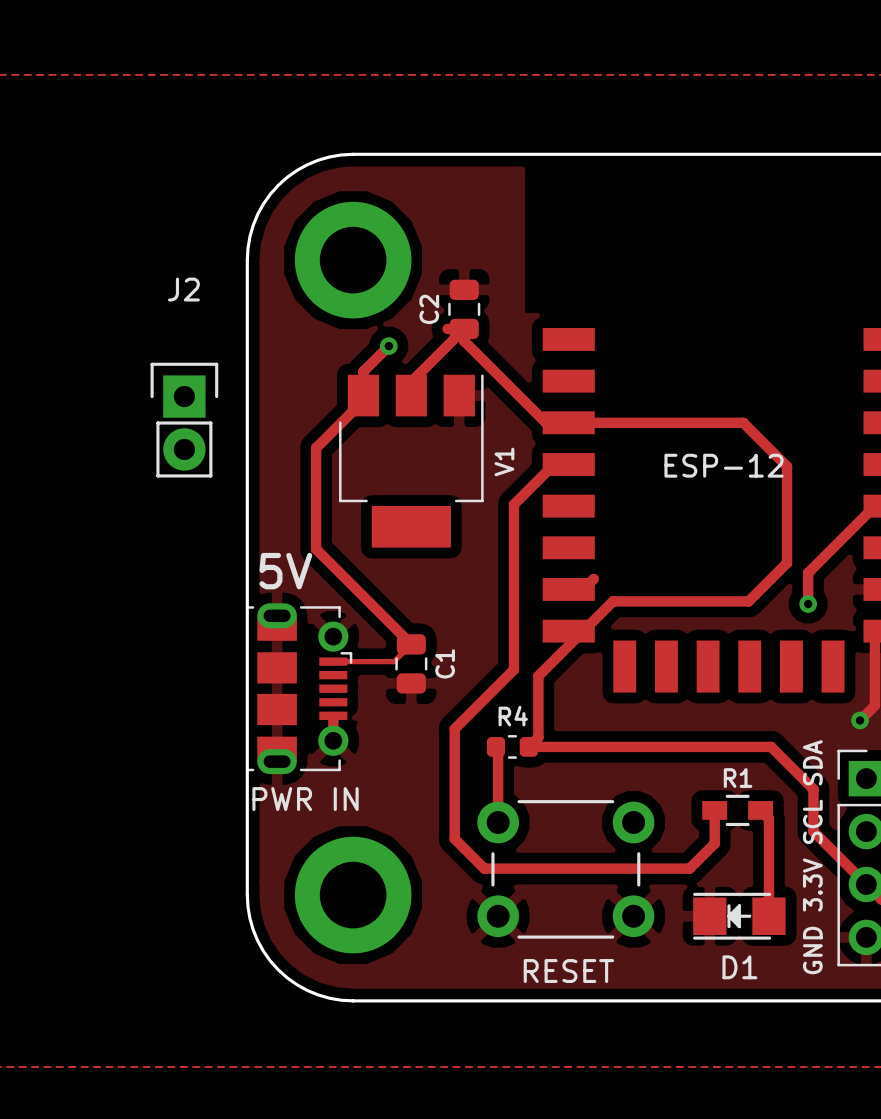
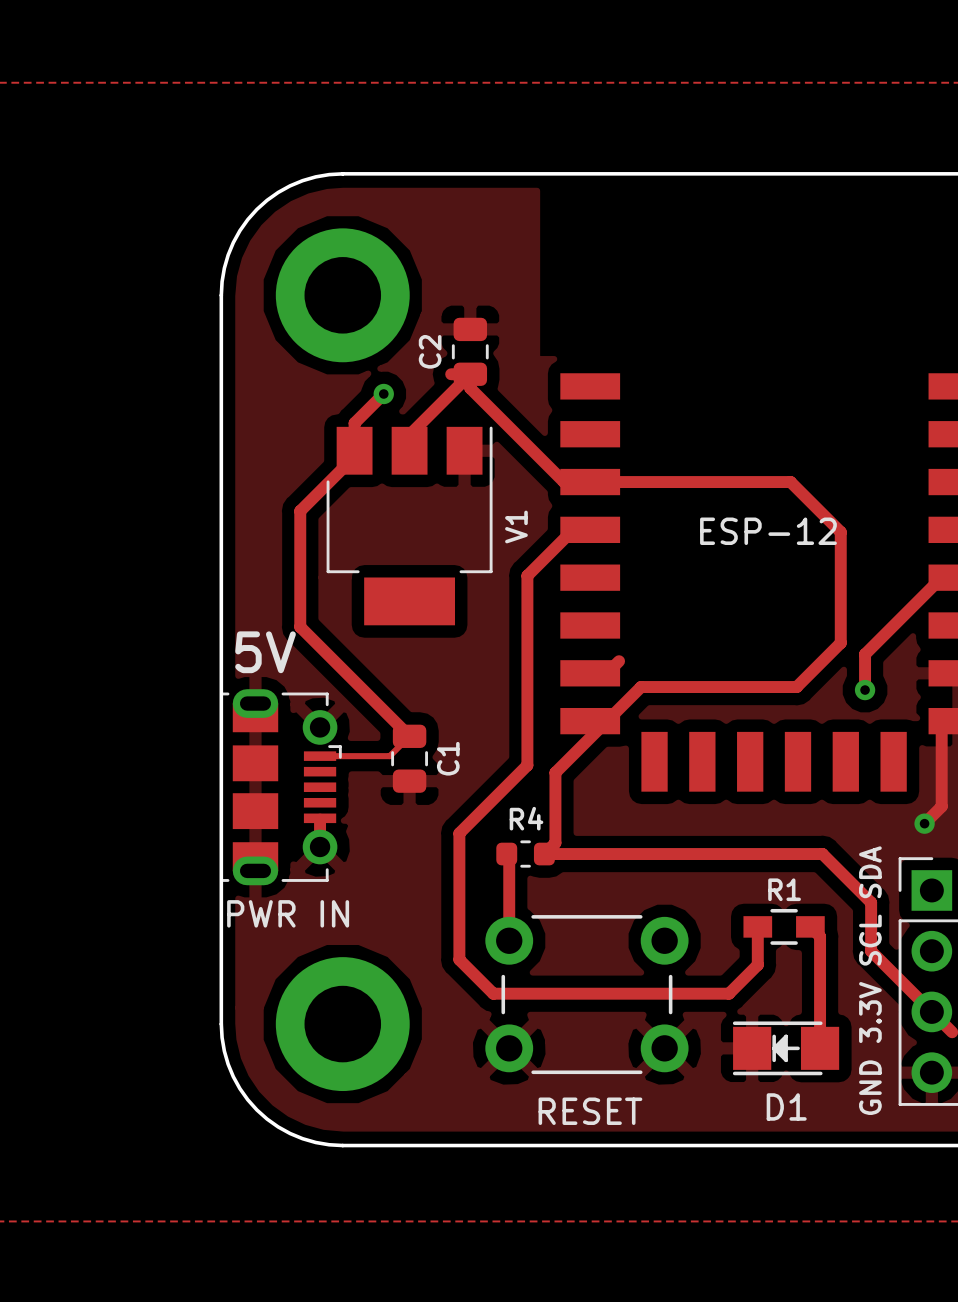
J2: (184, 420) -> none

